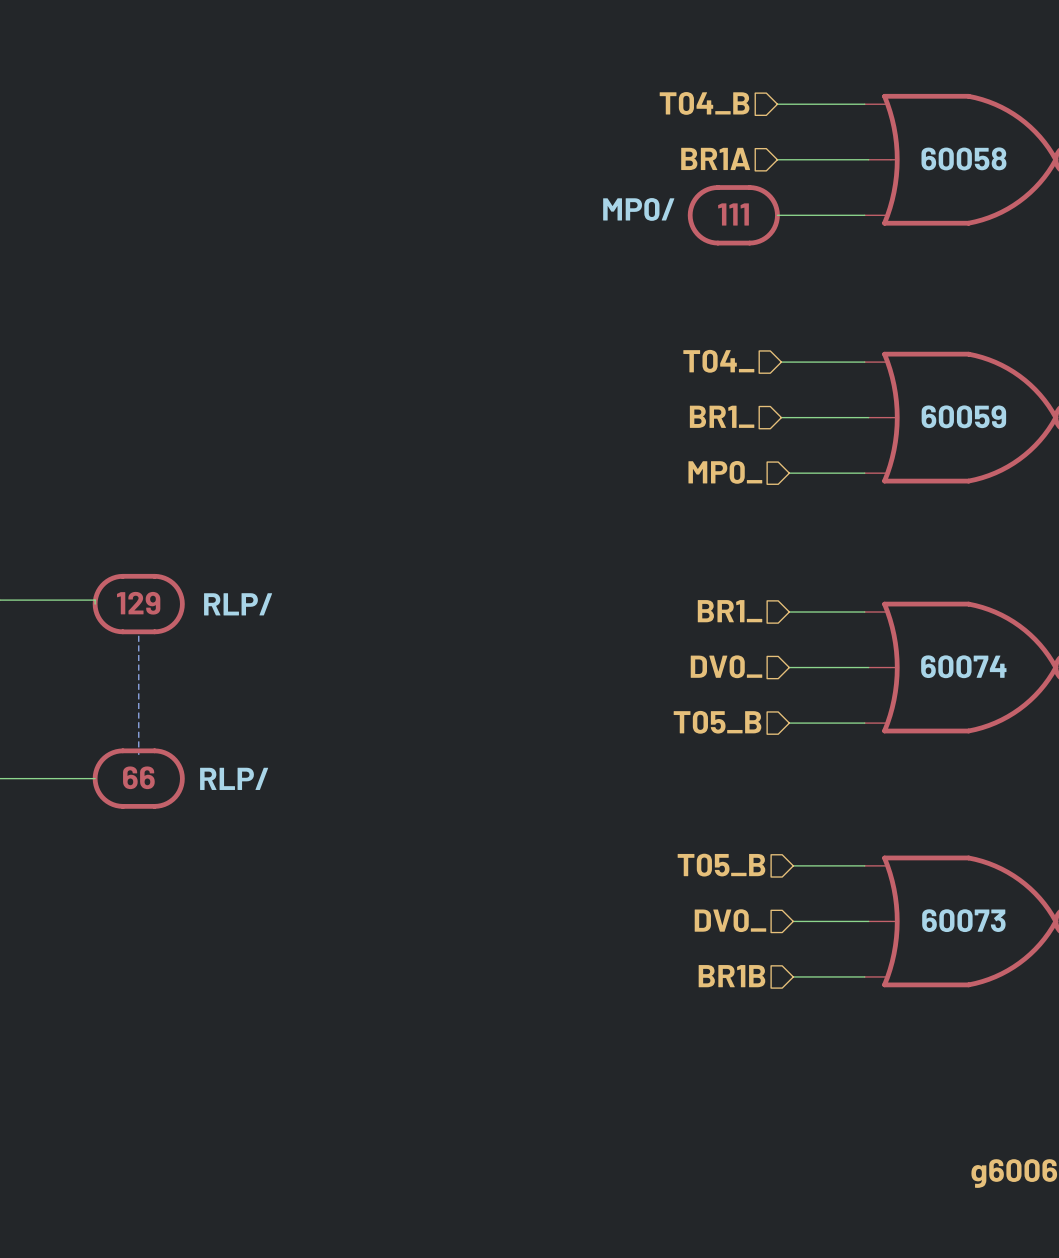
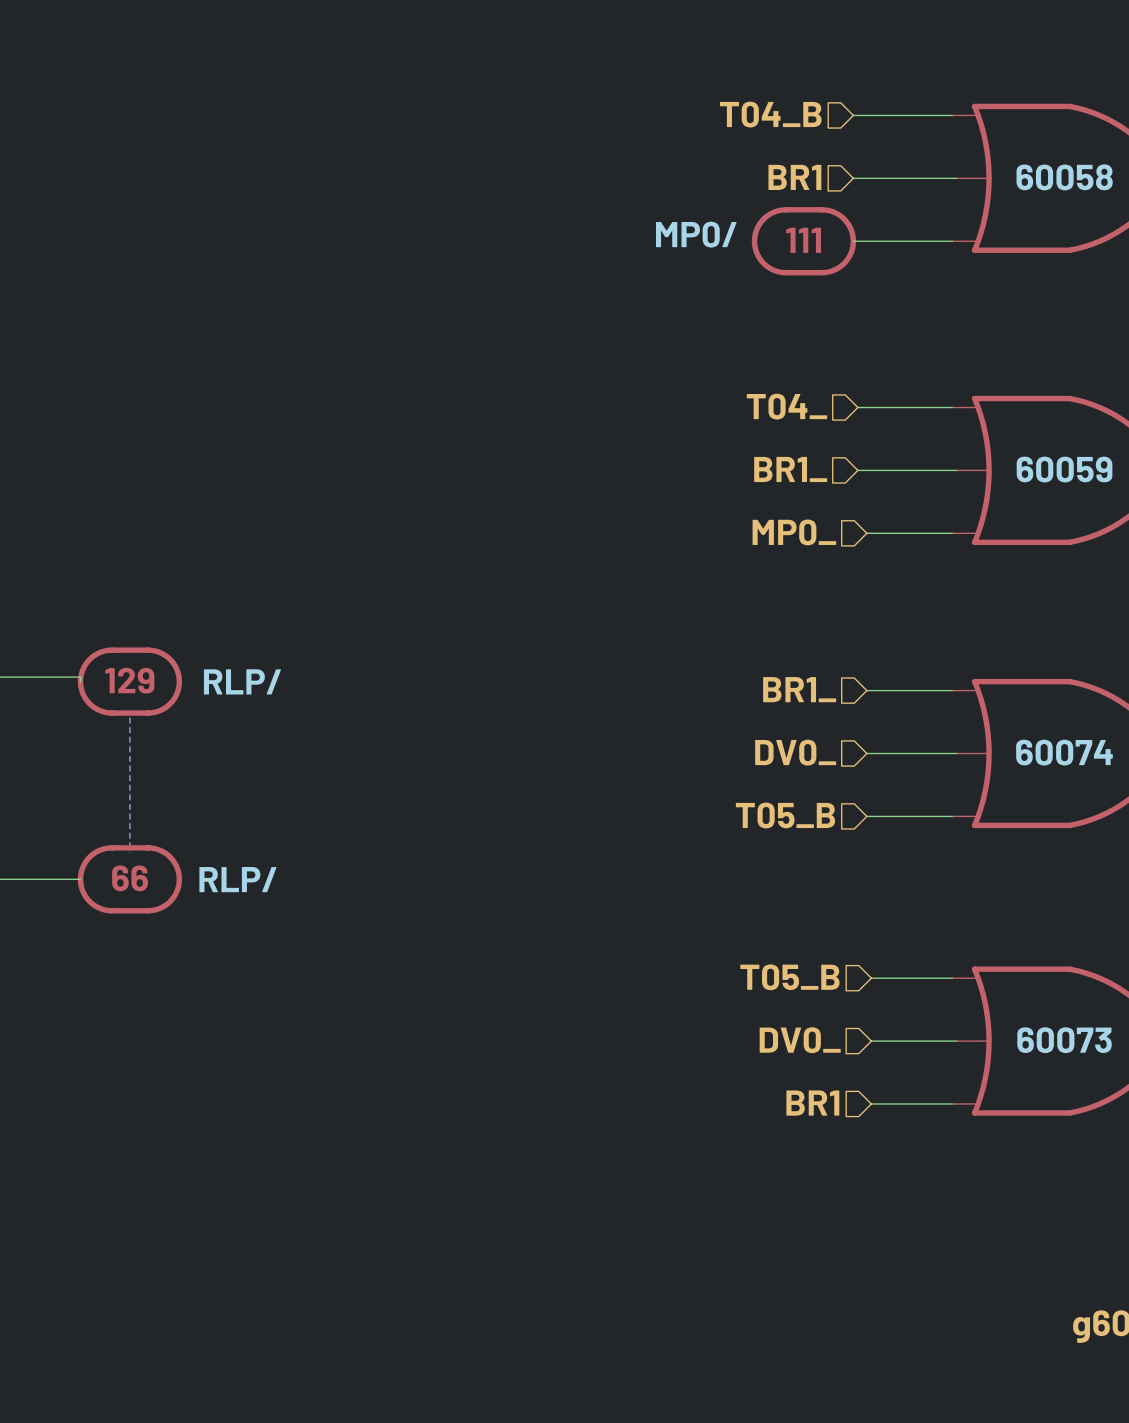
hierarchical label: BR1A (715, 158) -> BR1 (794, 177)
hierarchical label: BR1B (731, 976) -> BR1 (812, 1103)

